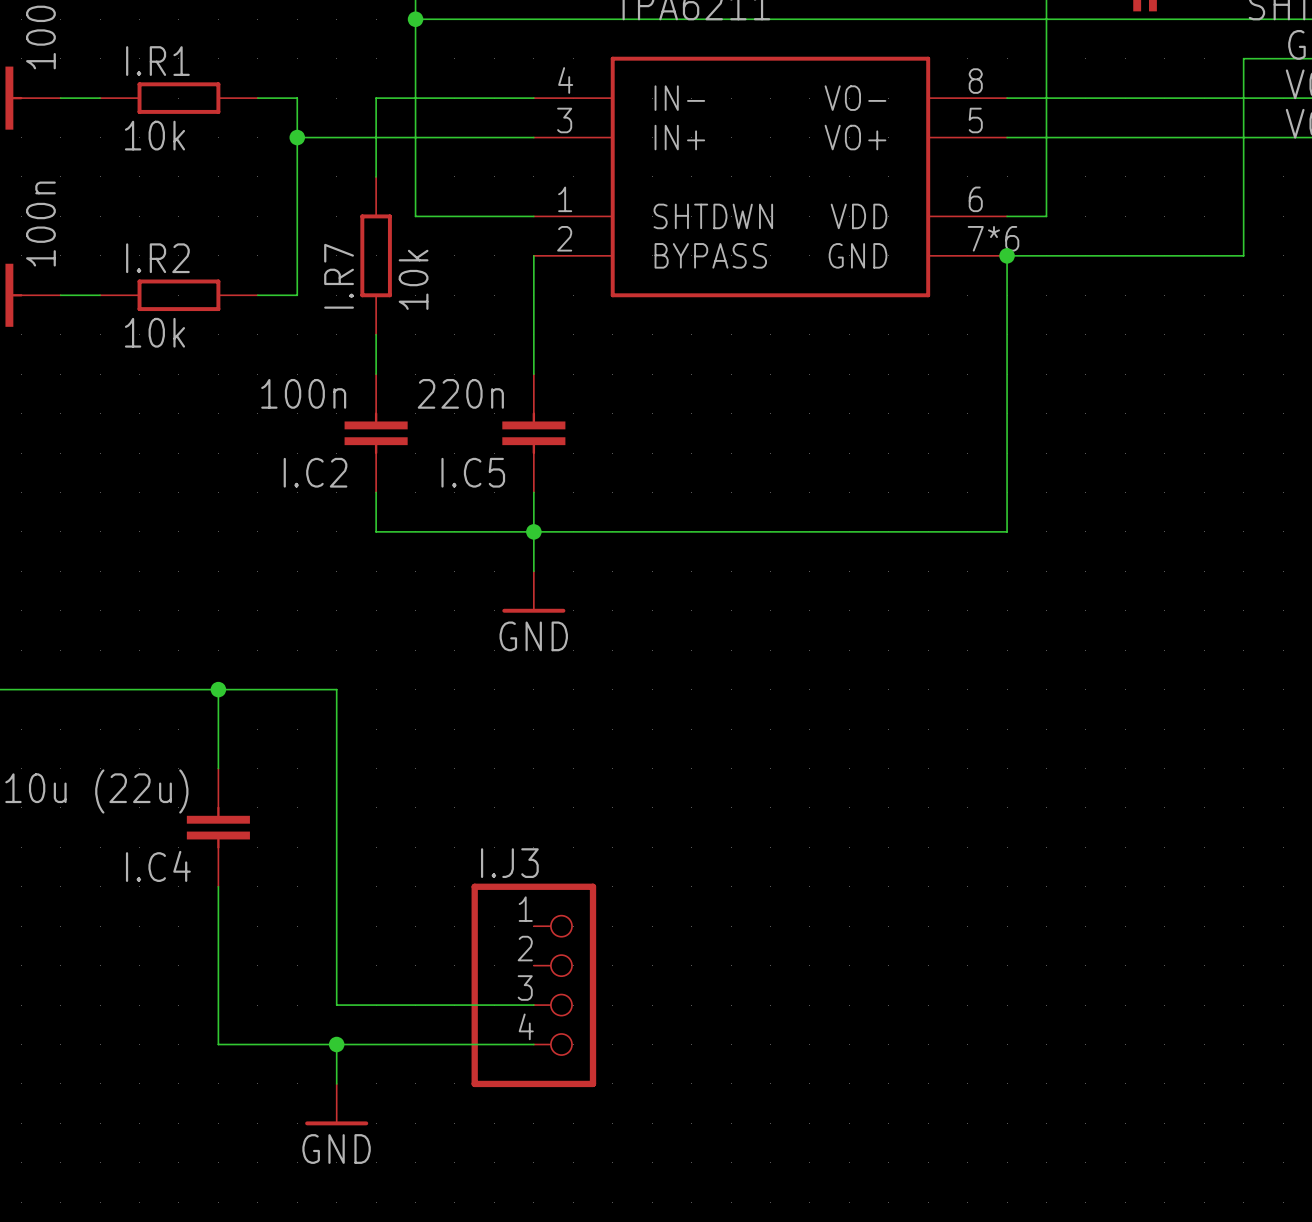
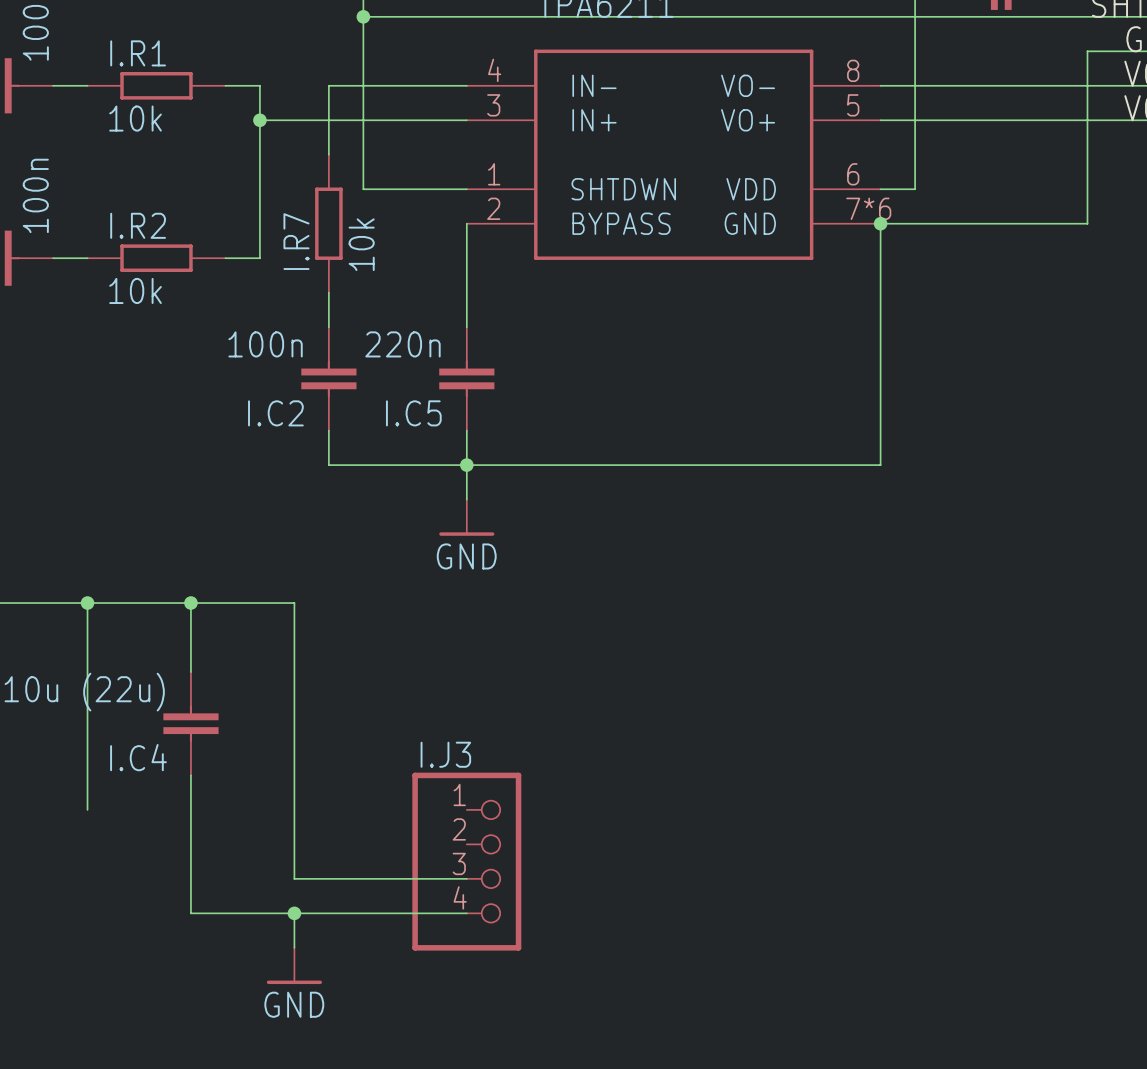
wire: none -> (87, 603) (87, 809)
junction: none -> (87, 603)

